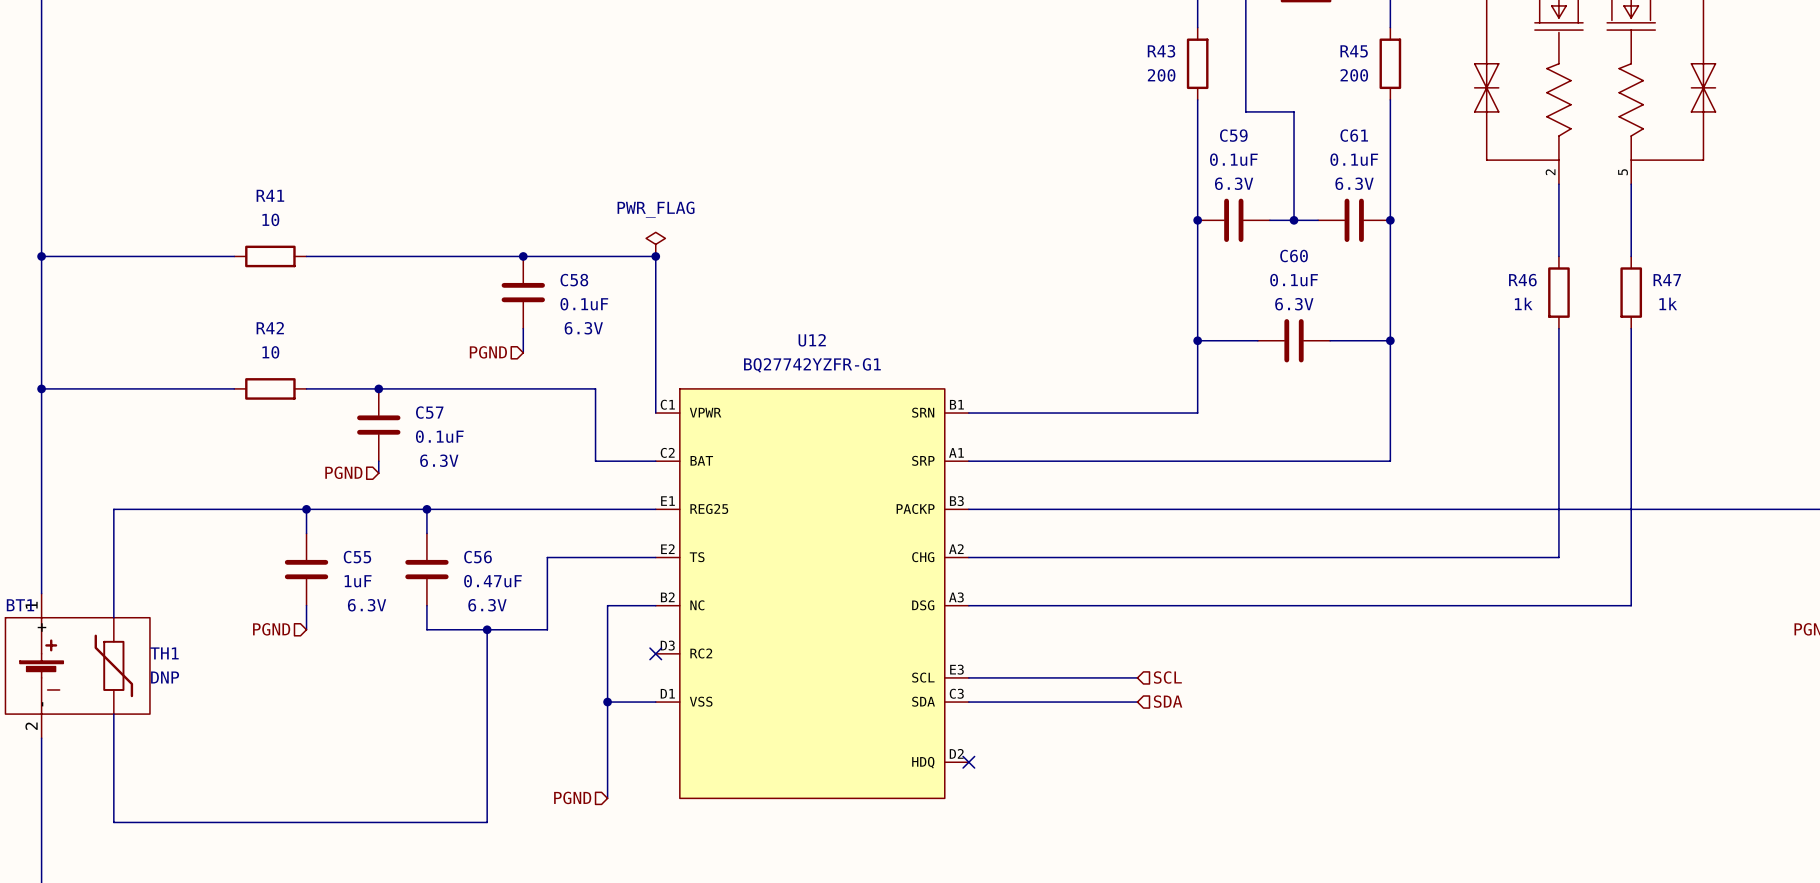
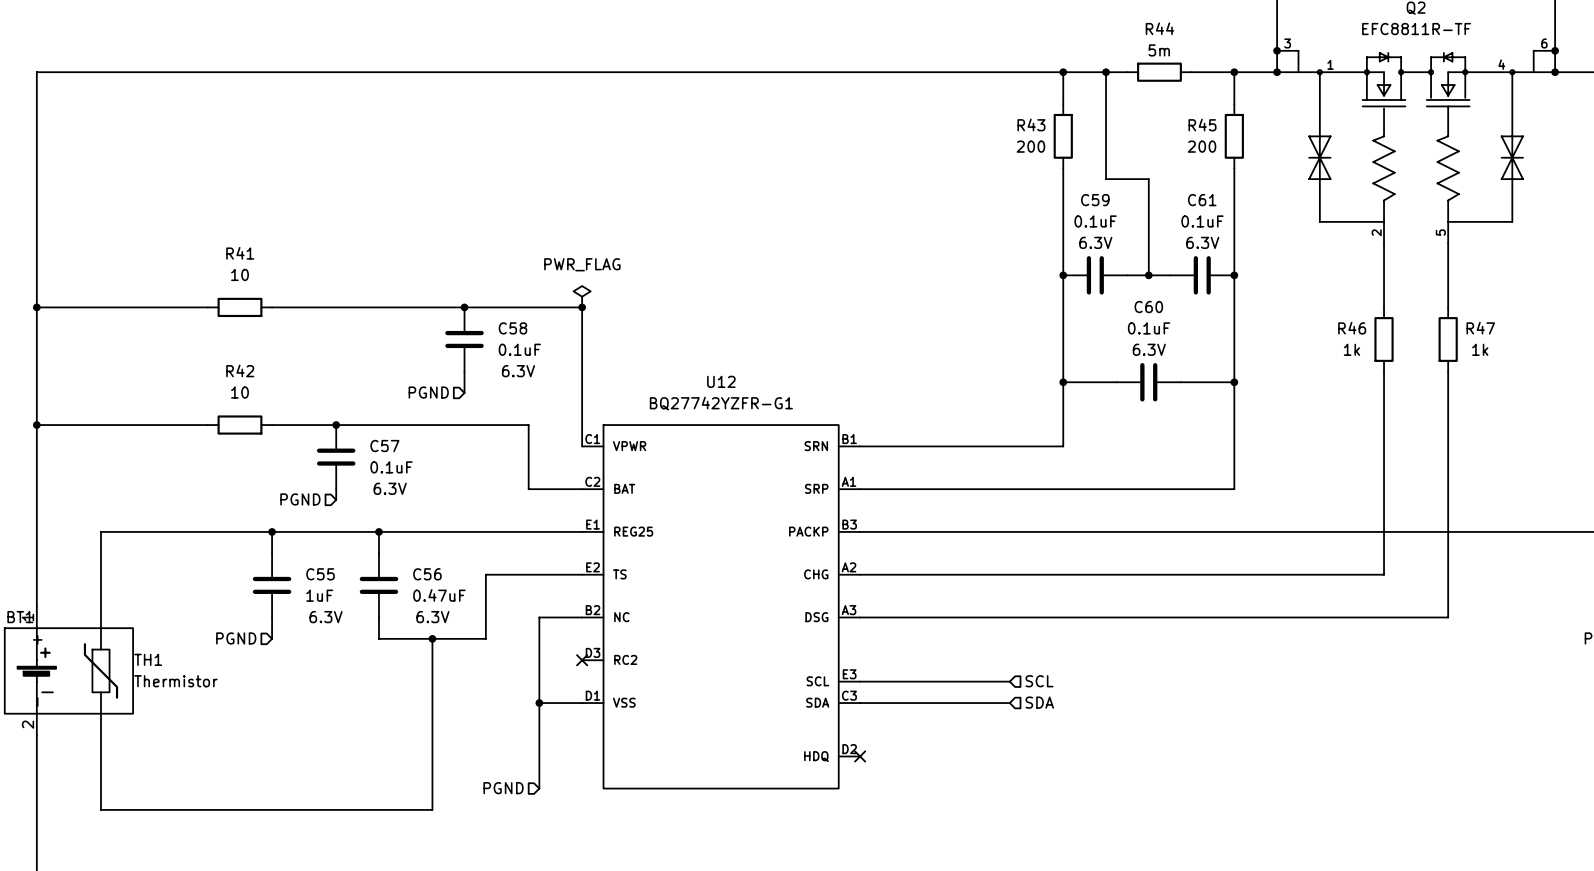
TH1 value: DNP (165, 677) -> Thermistor (175, 681)

